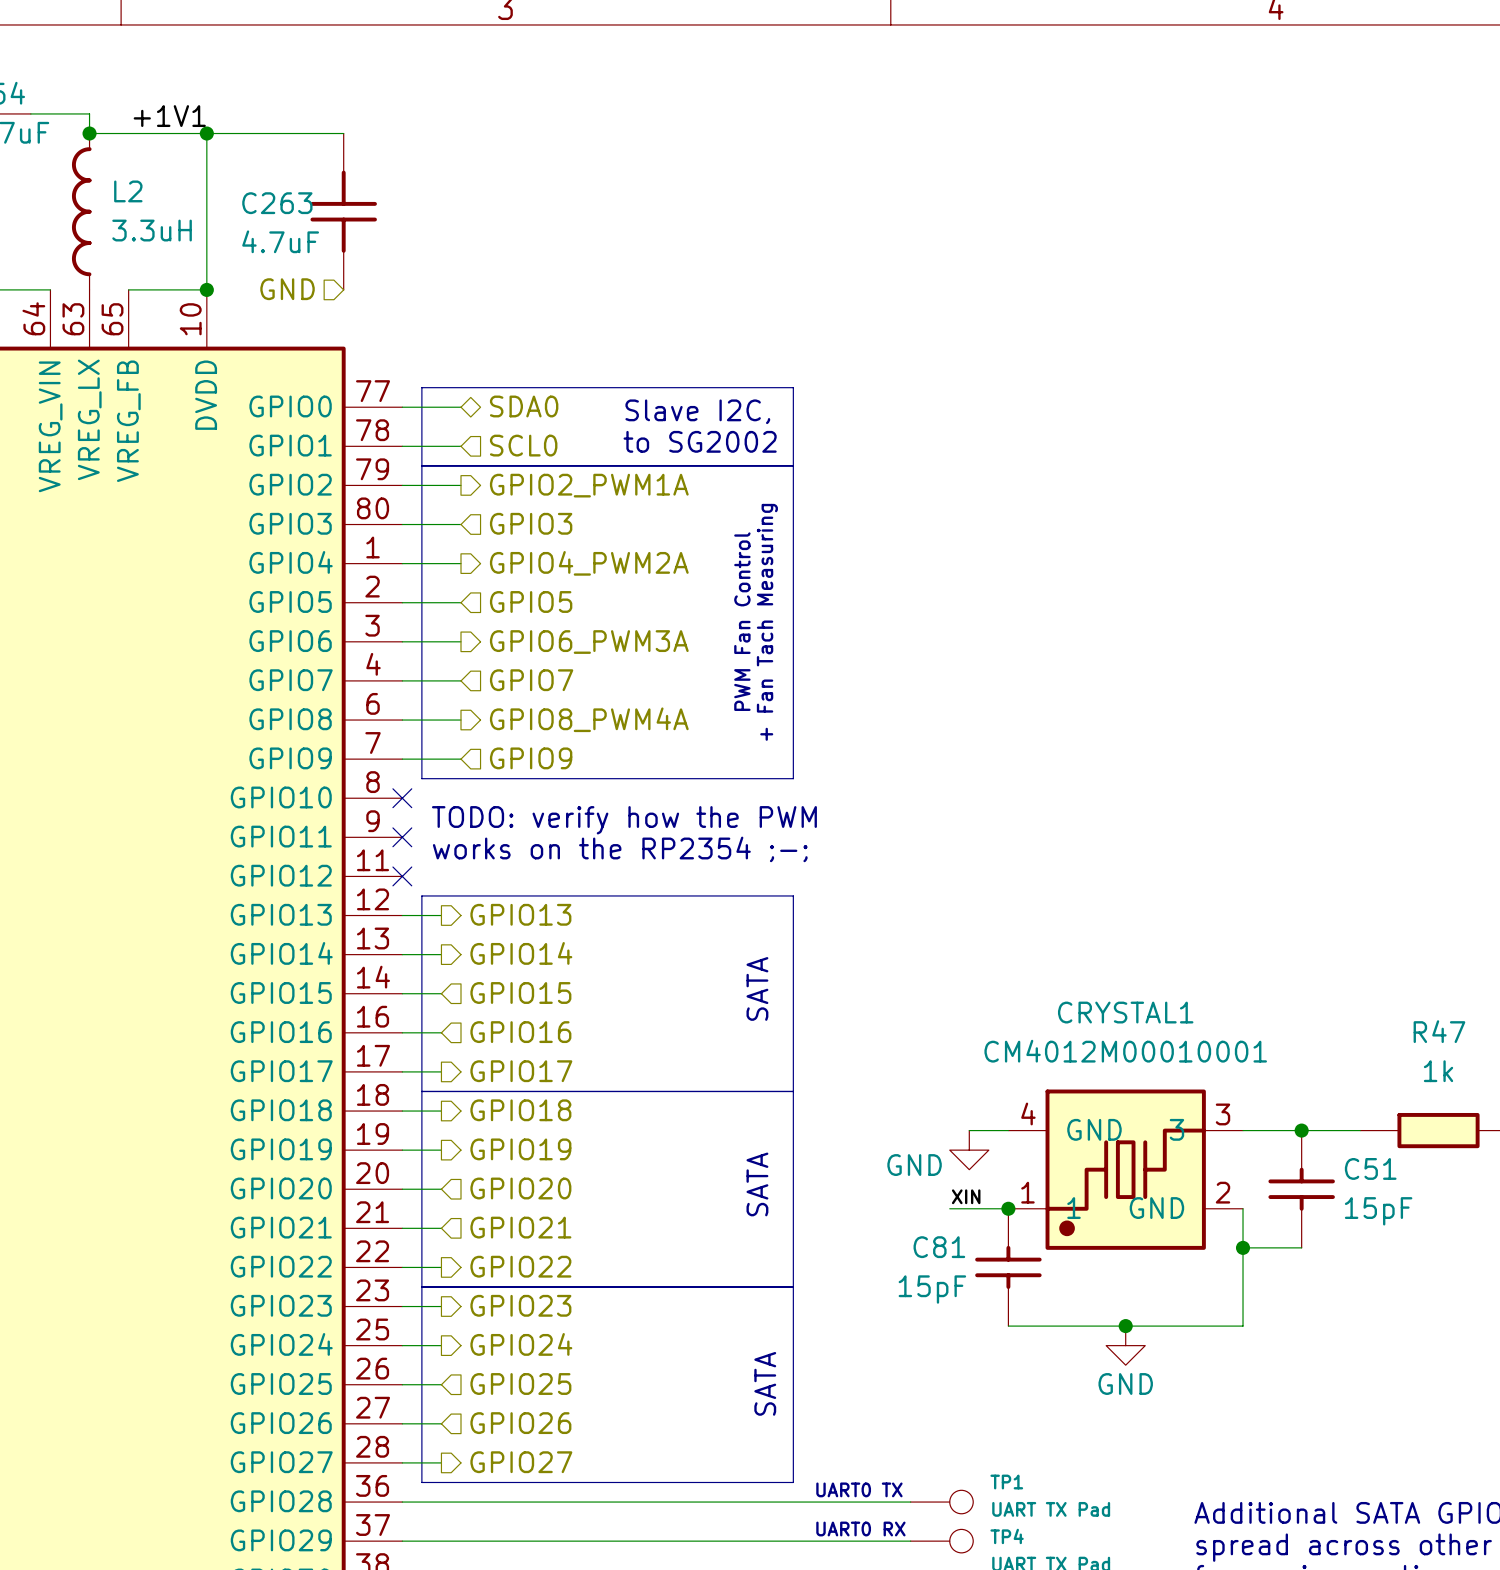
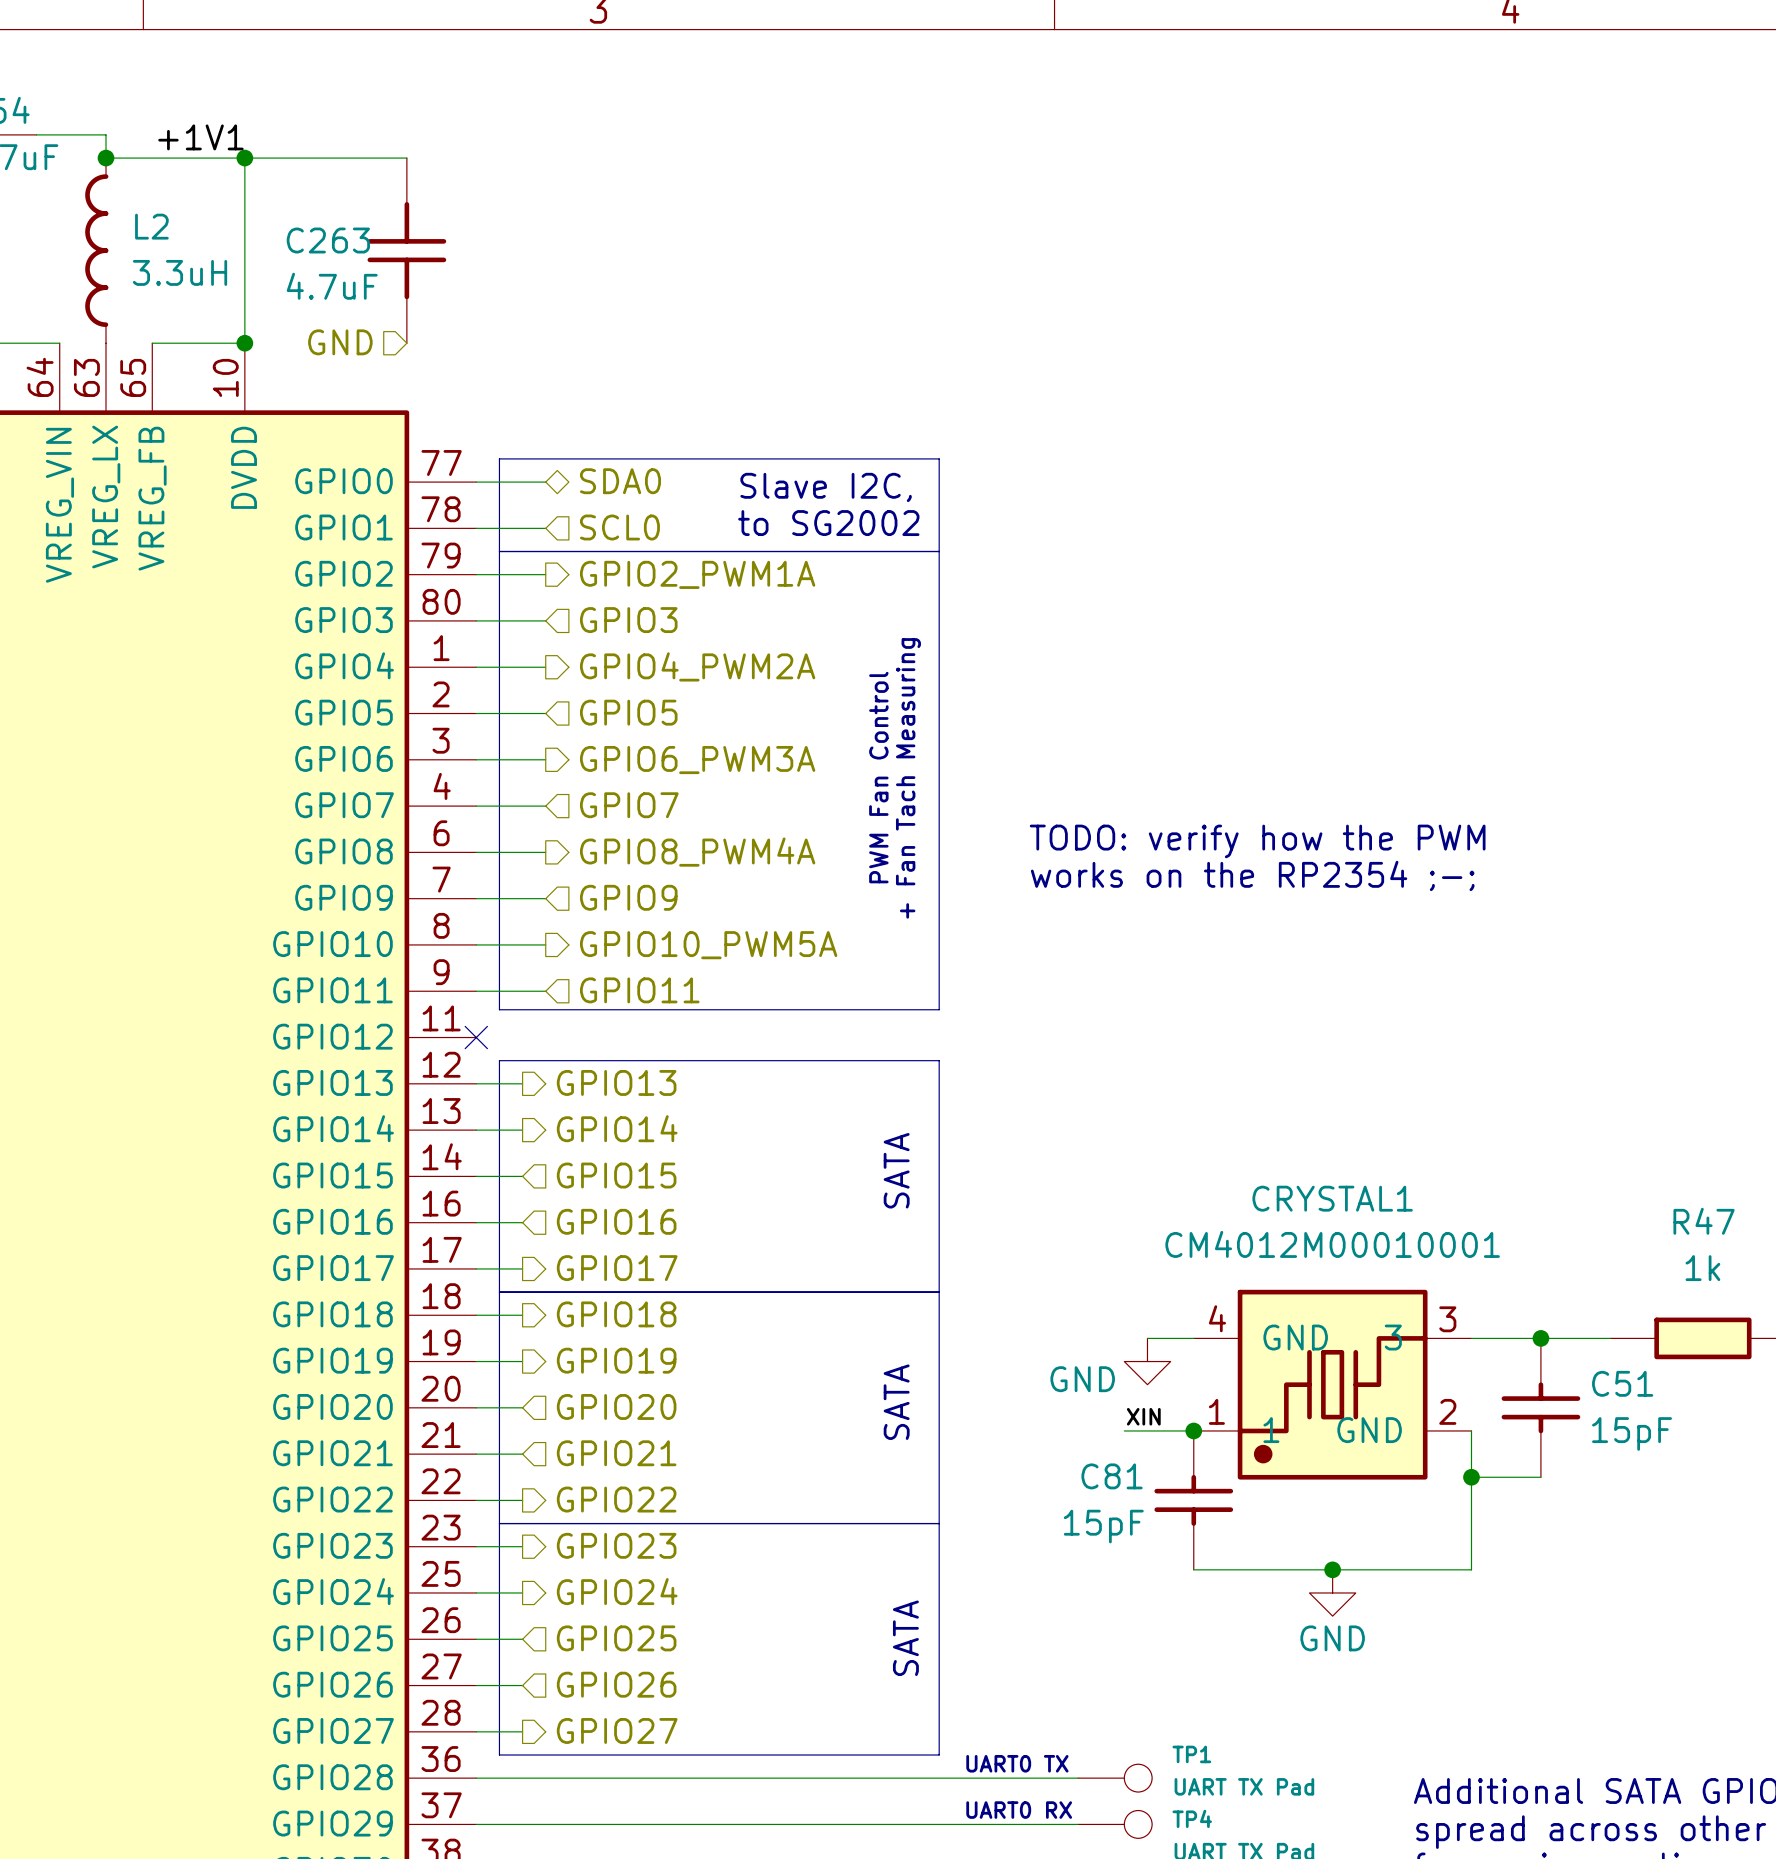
text position: PWM Fan Control (742, 621) -> PWM Fan Control (878, 777)
text position: + Fan Tach Measuring (767, 622) -> + Fan Tach Measuring (908, 778)
text: none -> TODO: verify how the PWM (1257, 841)
text: none -> works on the RP2354 ;-; (1252, 875)
line: (421, 778) (793, 778) -> (499, 921) (499, 1009) (939, 1009) (939, 921)
wire: none -> (476, 944) (545, 944)
no-connect mark: (402, 798) -> none
hierarchical label: none -> GPIO10_PWM5A (708, 945)
text: TODO: verify how the PWM (624, 820) -> none
hierarchical label: none -> GPIO11 (639, 990)
wire: none -> (476, 991) (545, 991)
no-connect mark: (402, 837) -> none
text: works on the RP2354 ;-; (620, 849) -> none

